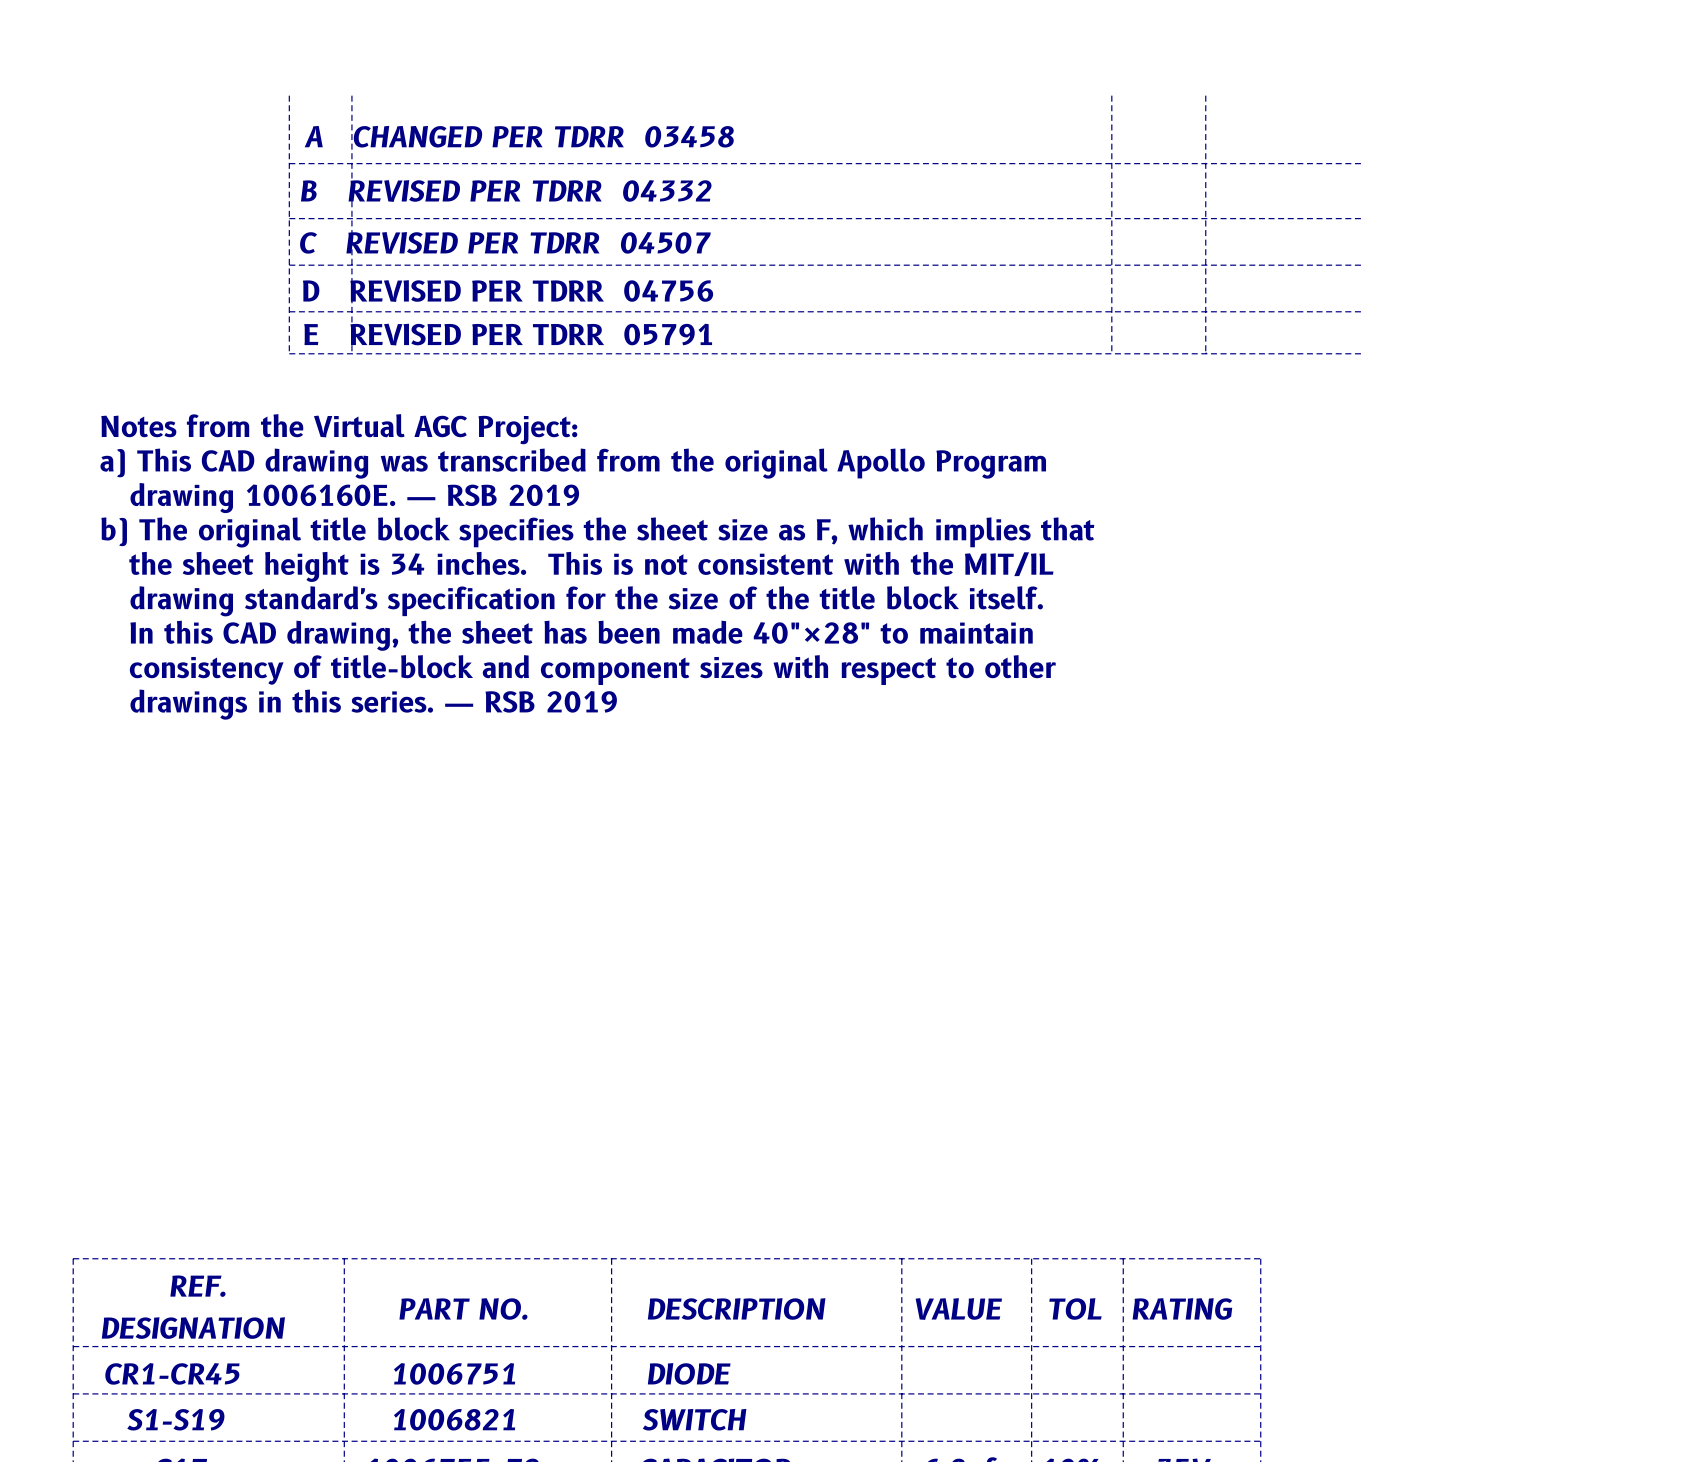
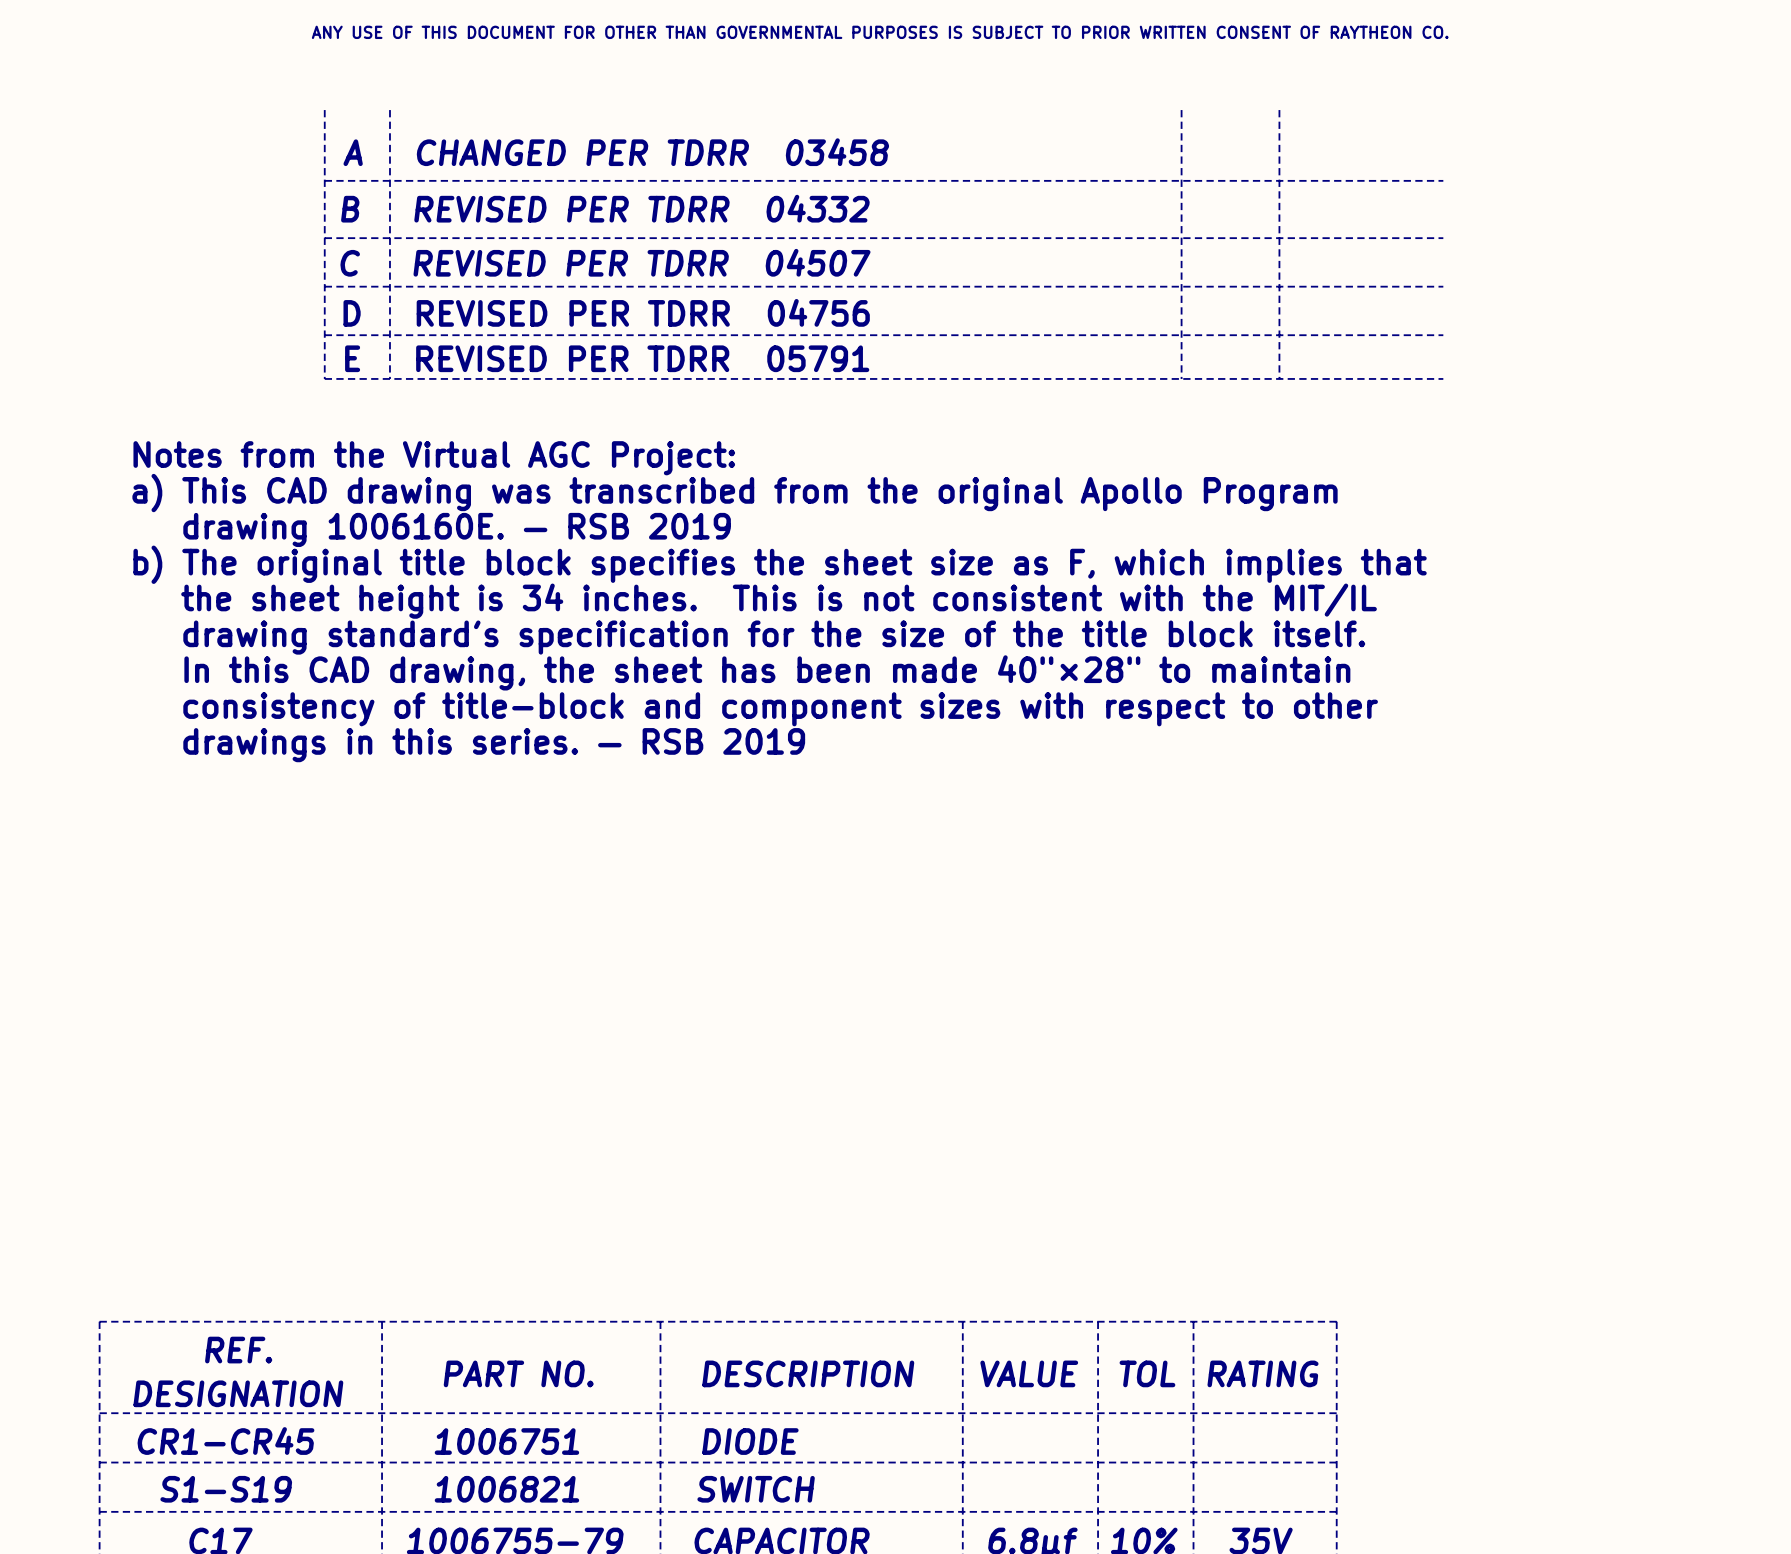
text: none -> ANY USE OF THIS DOCUMENT FOR OTHER THAN GOVERNMENTAL PURPOSES IS SUBJECT TO PRIOR WRITTEN CONSENT OF RAYTHEON CO. (880, 32)

